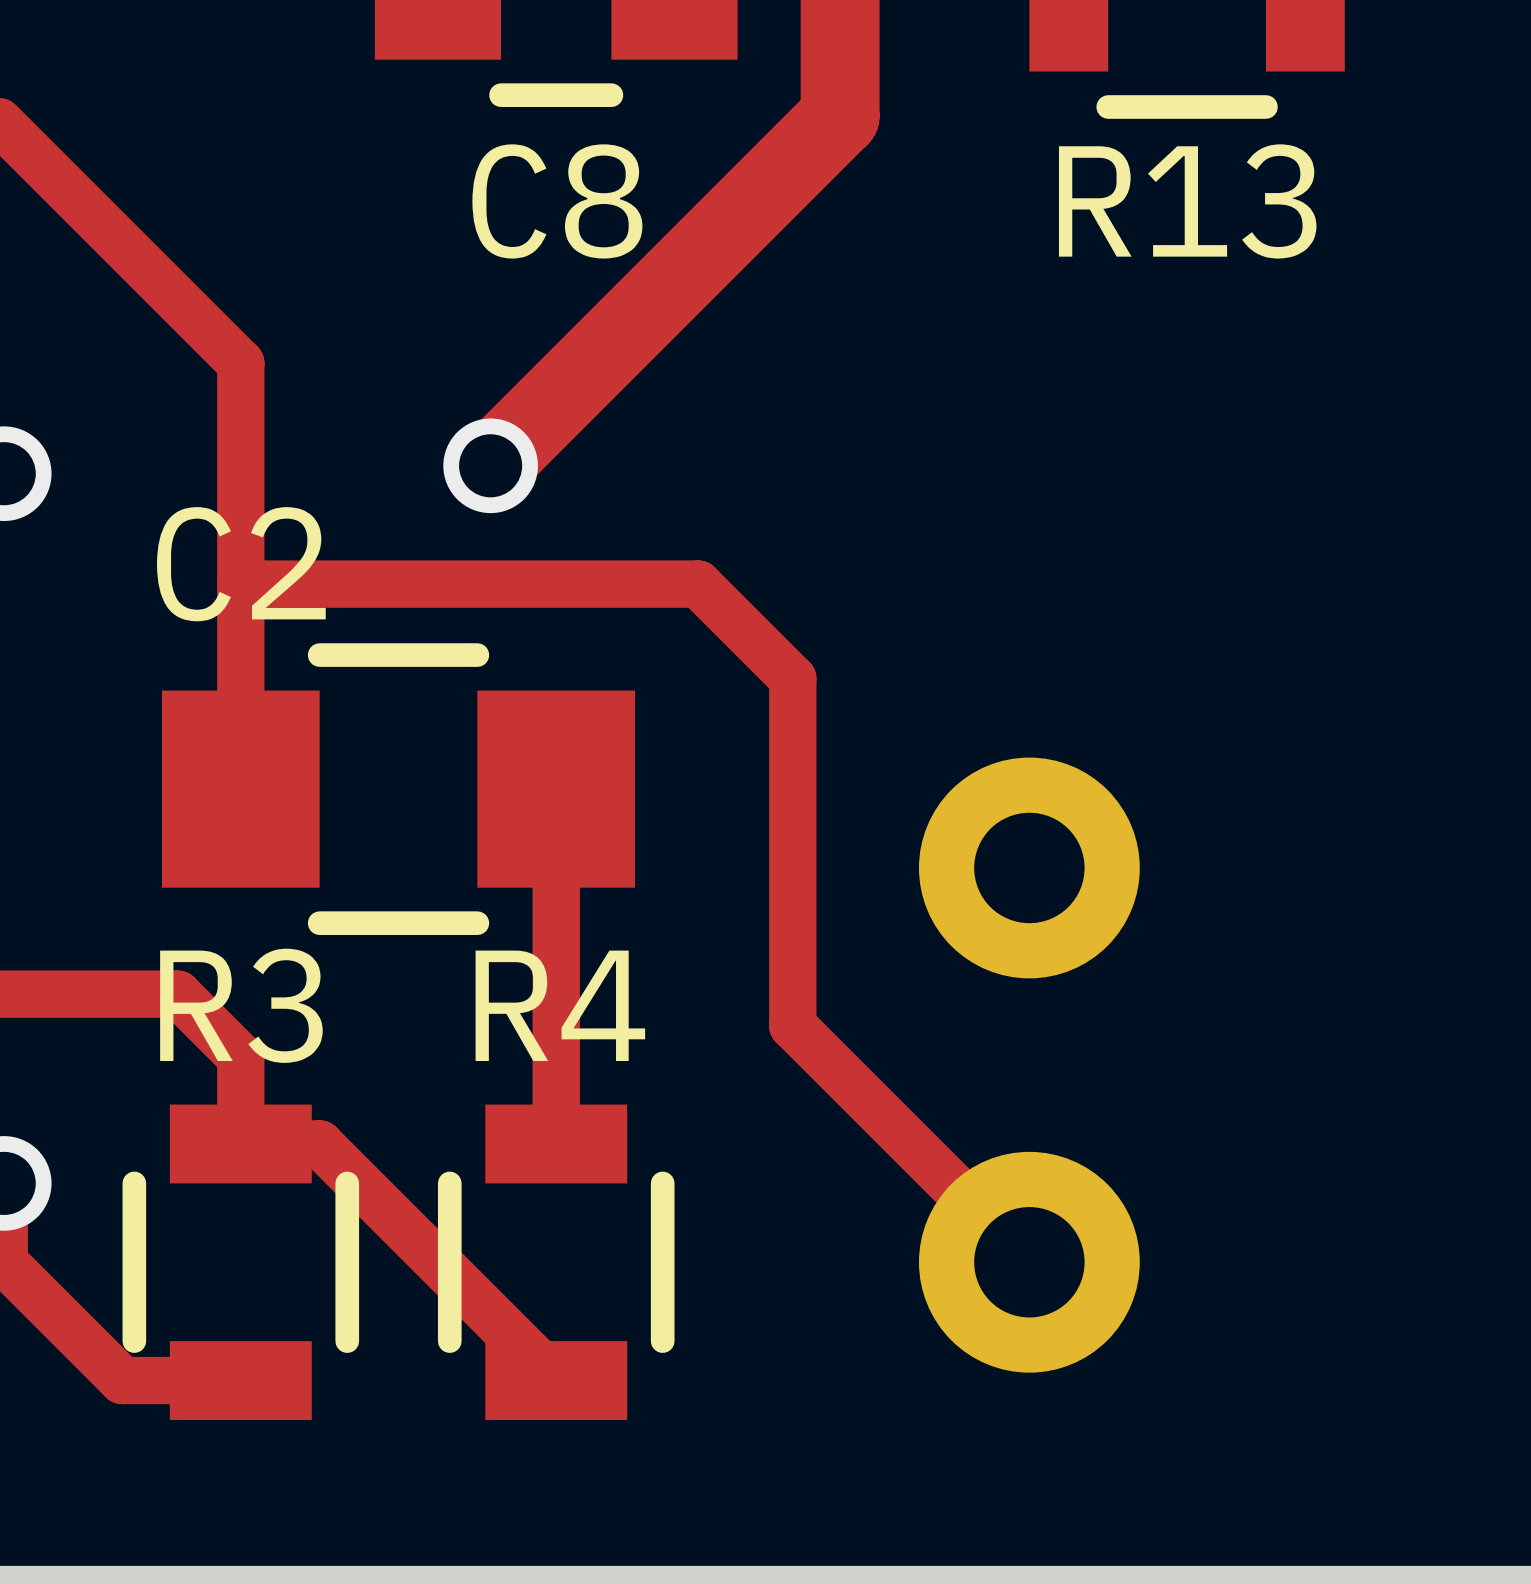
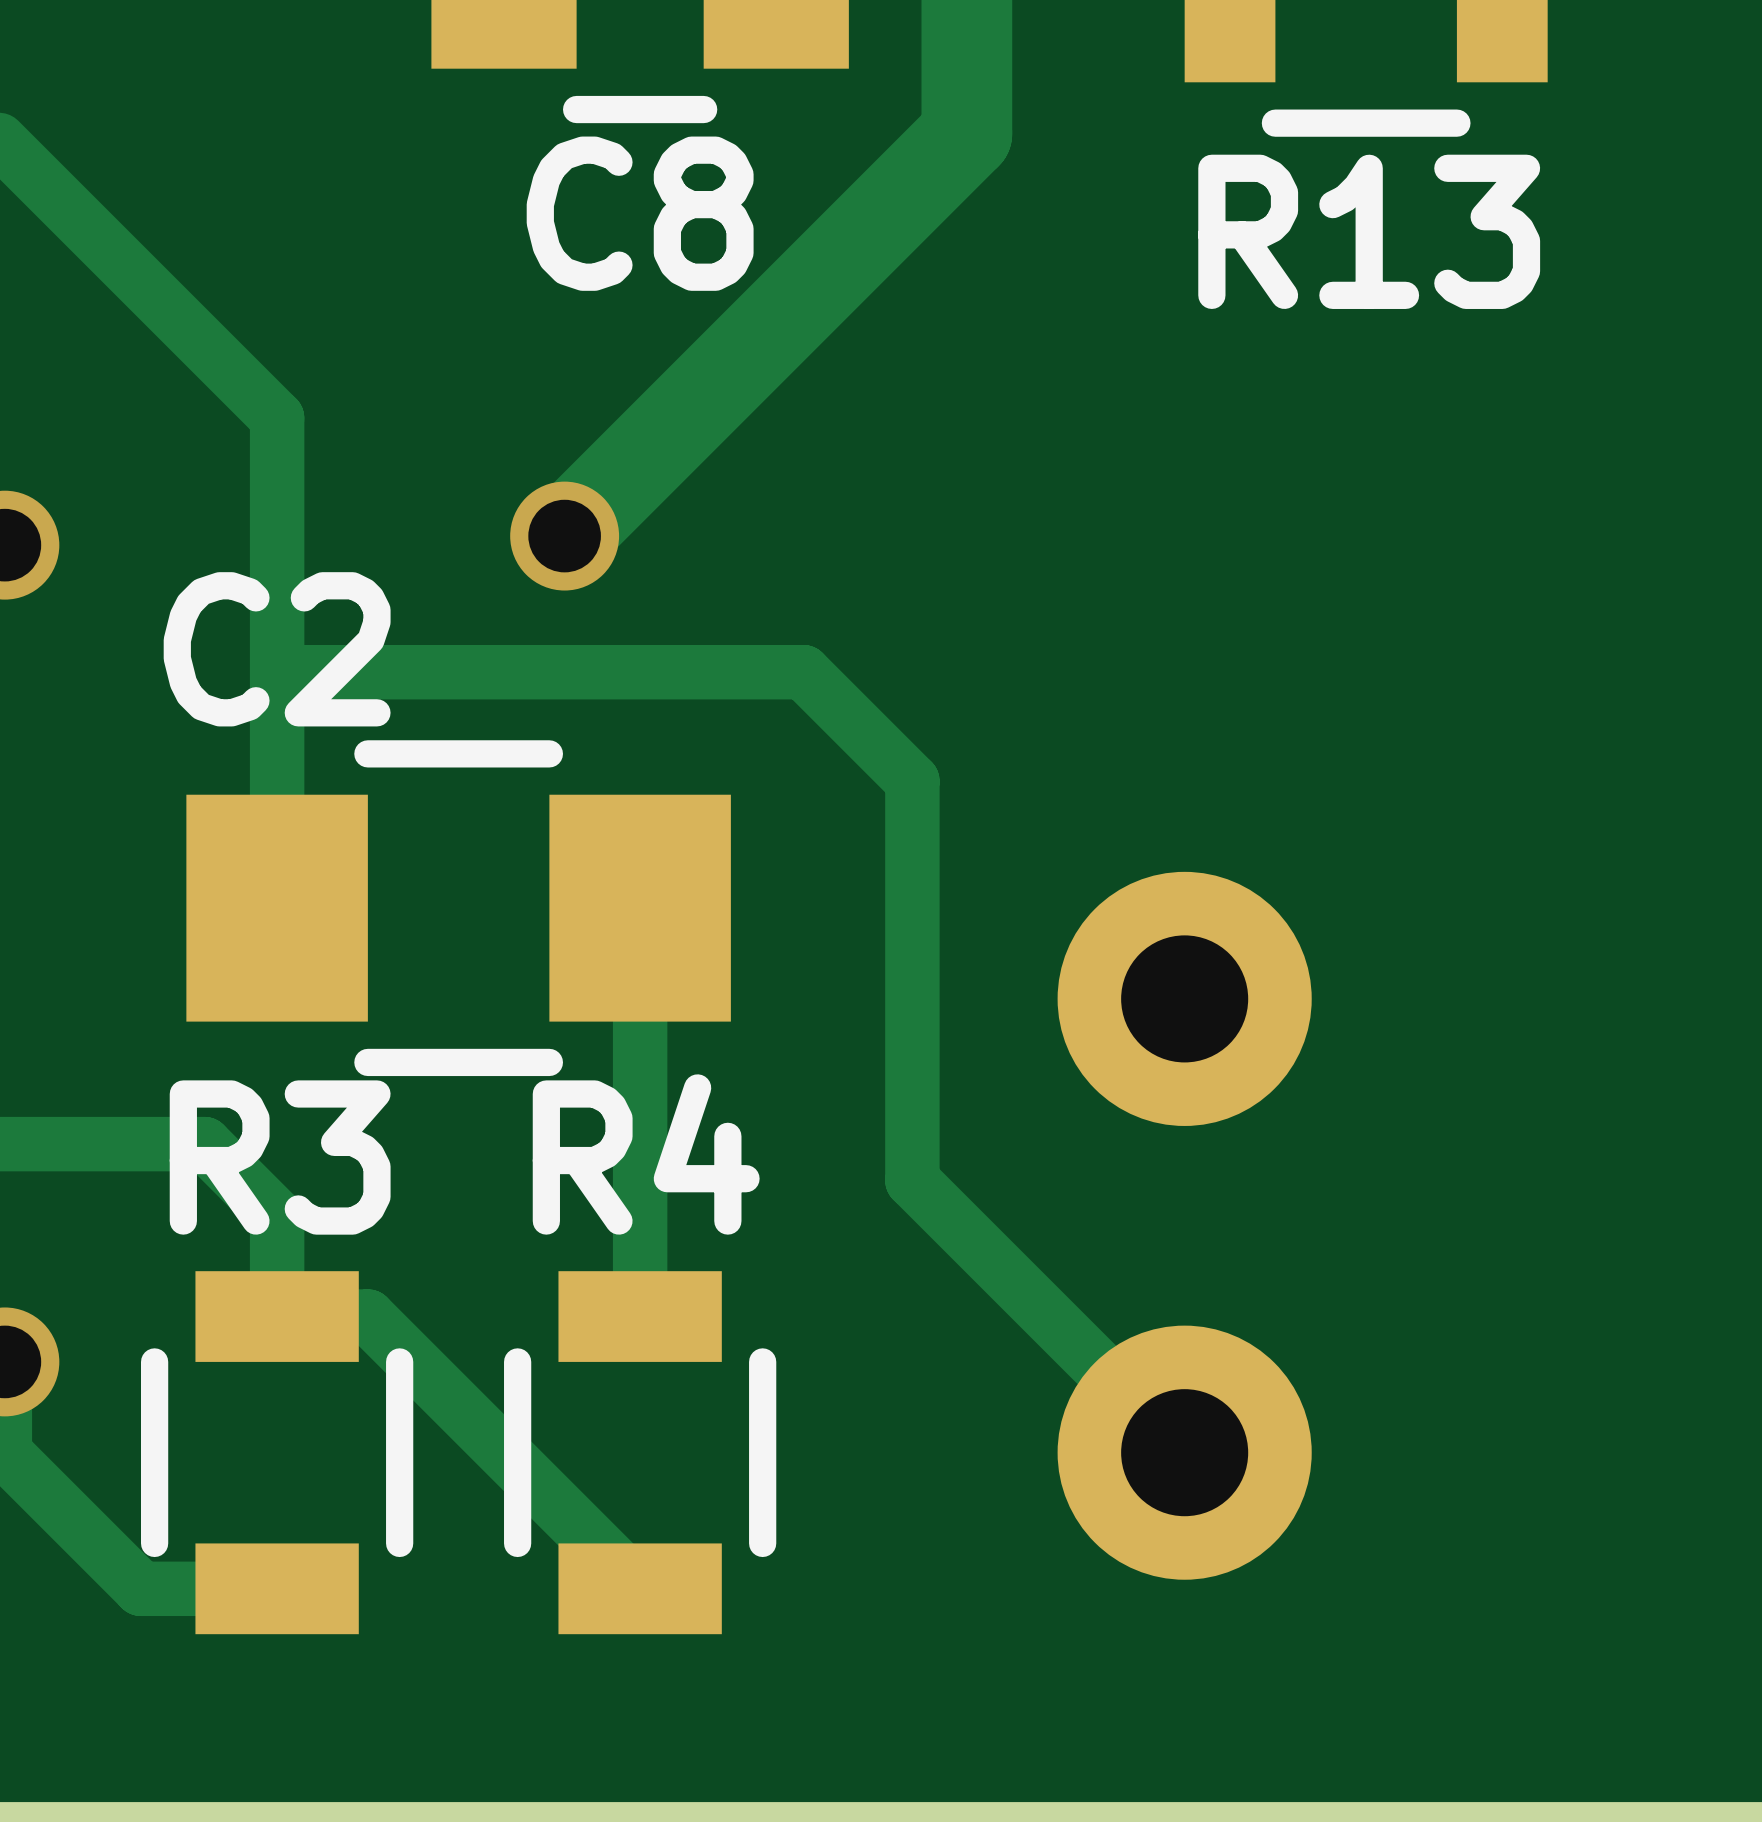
C8 name position: C8 (557, 201) -> C8 (640, 213)

